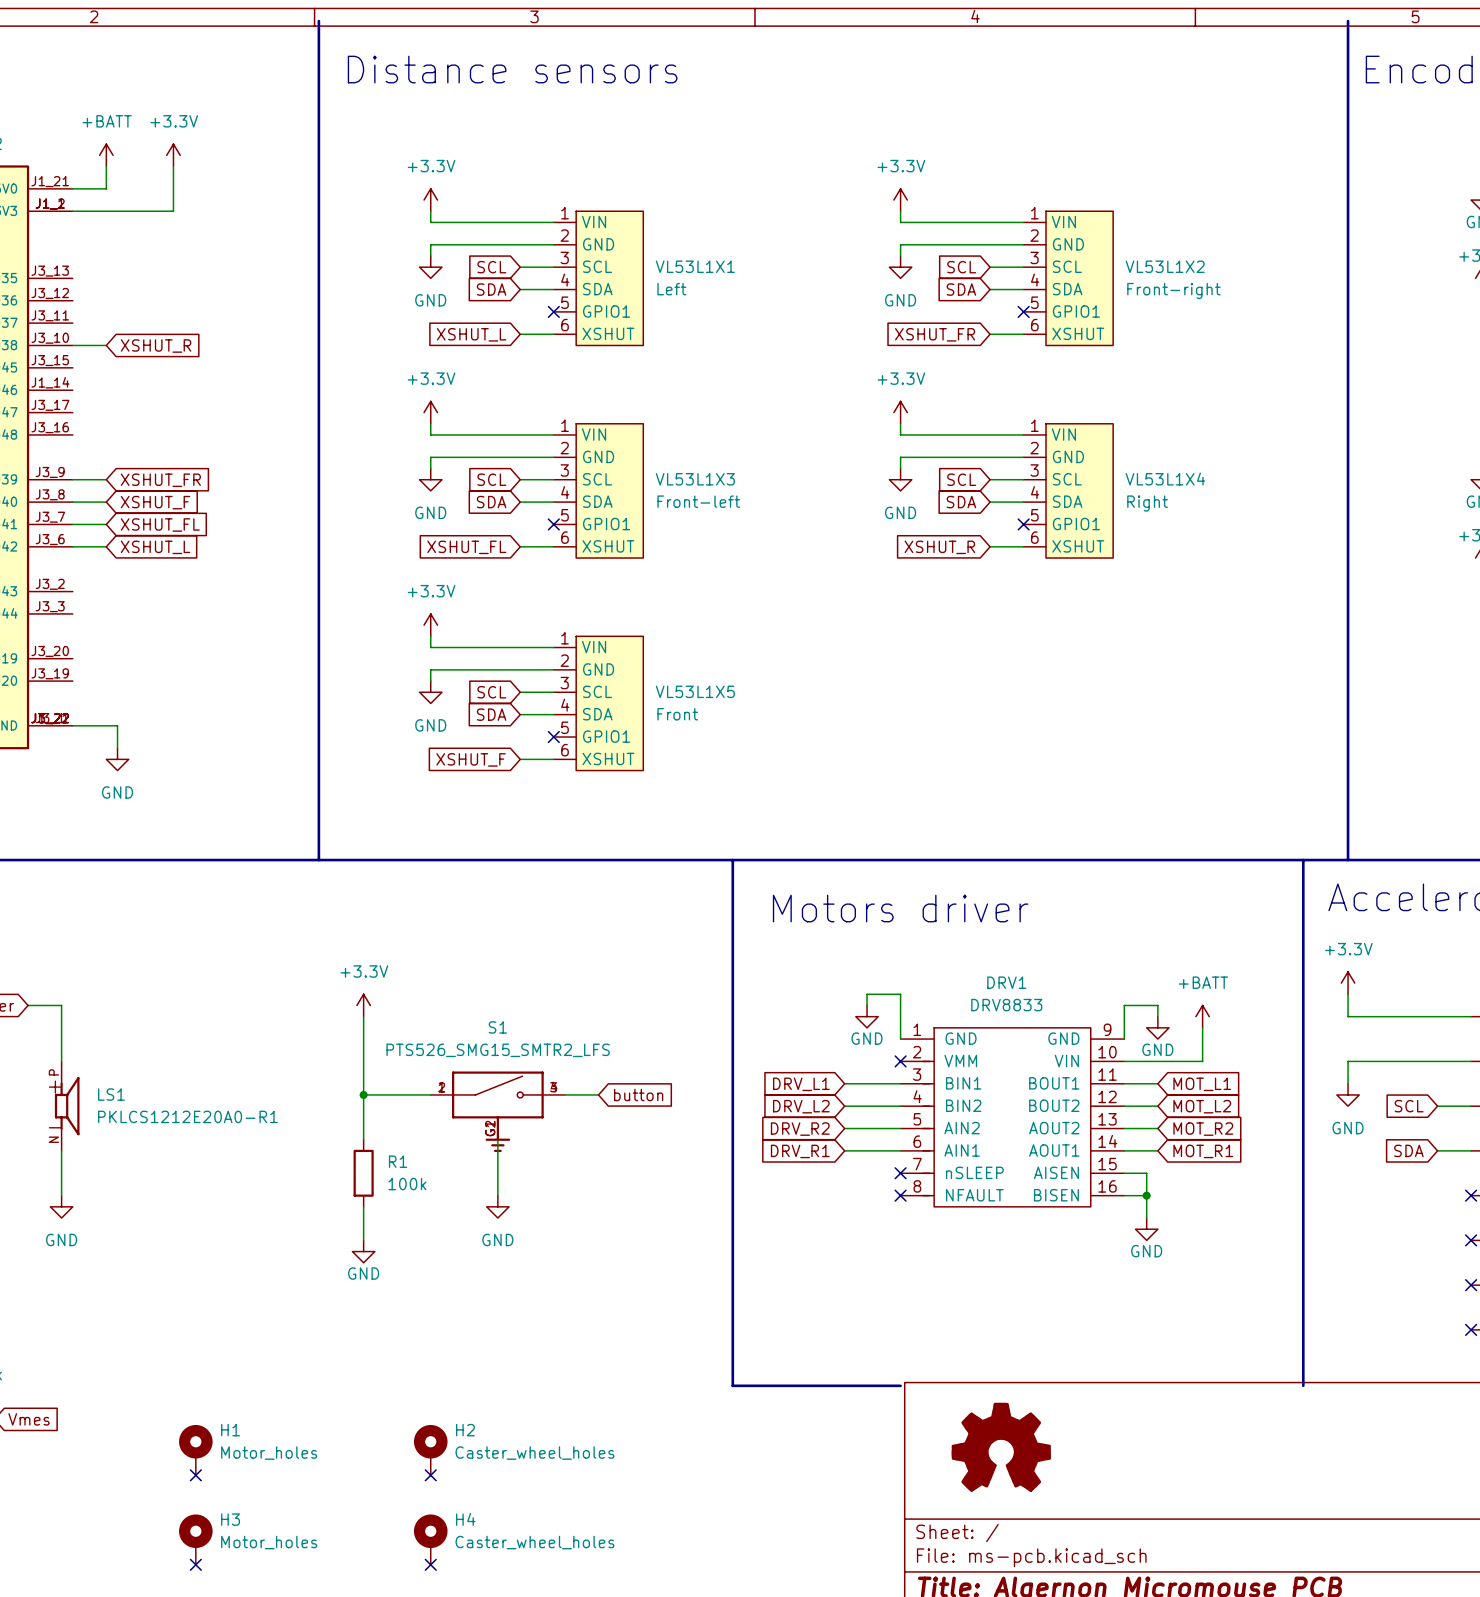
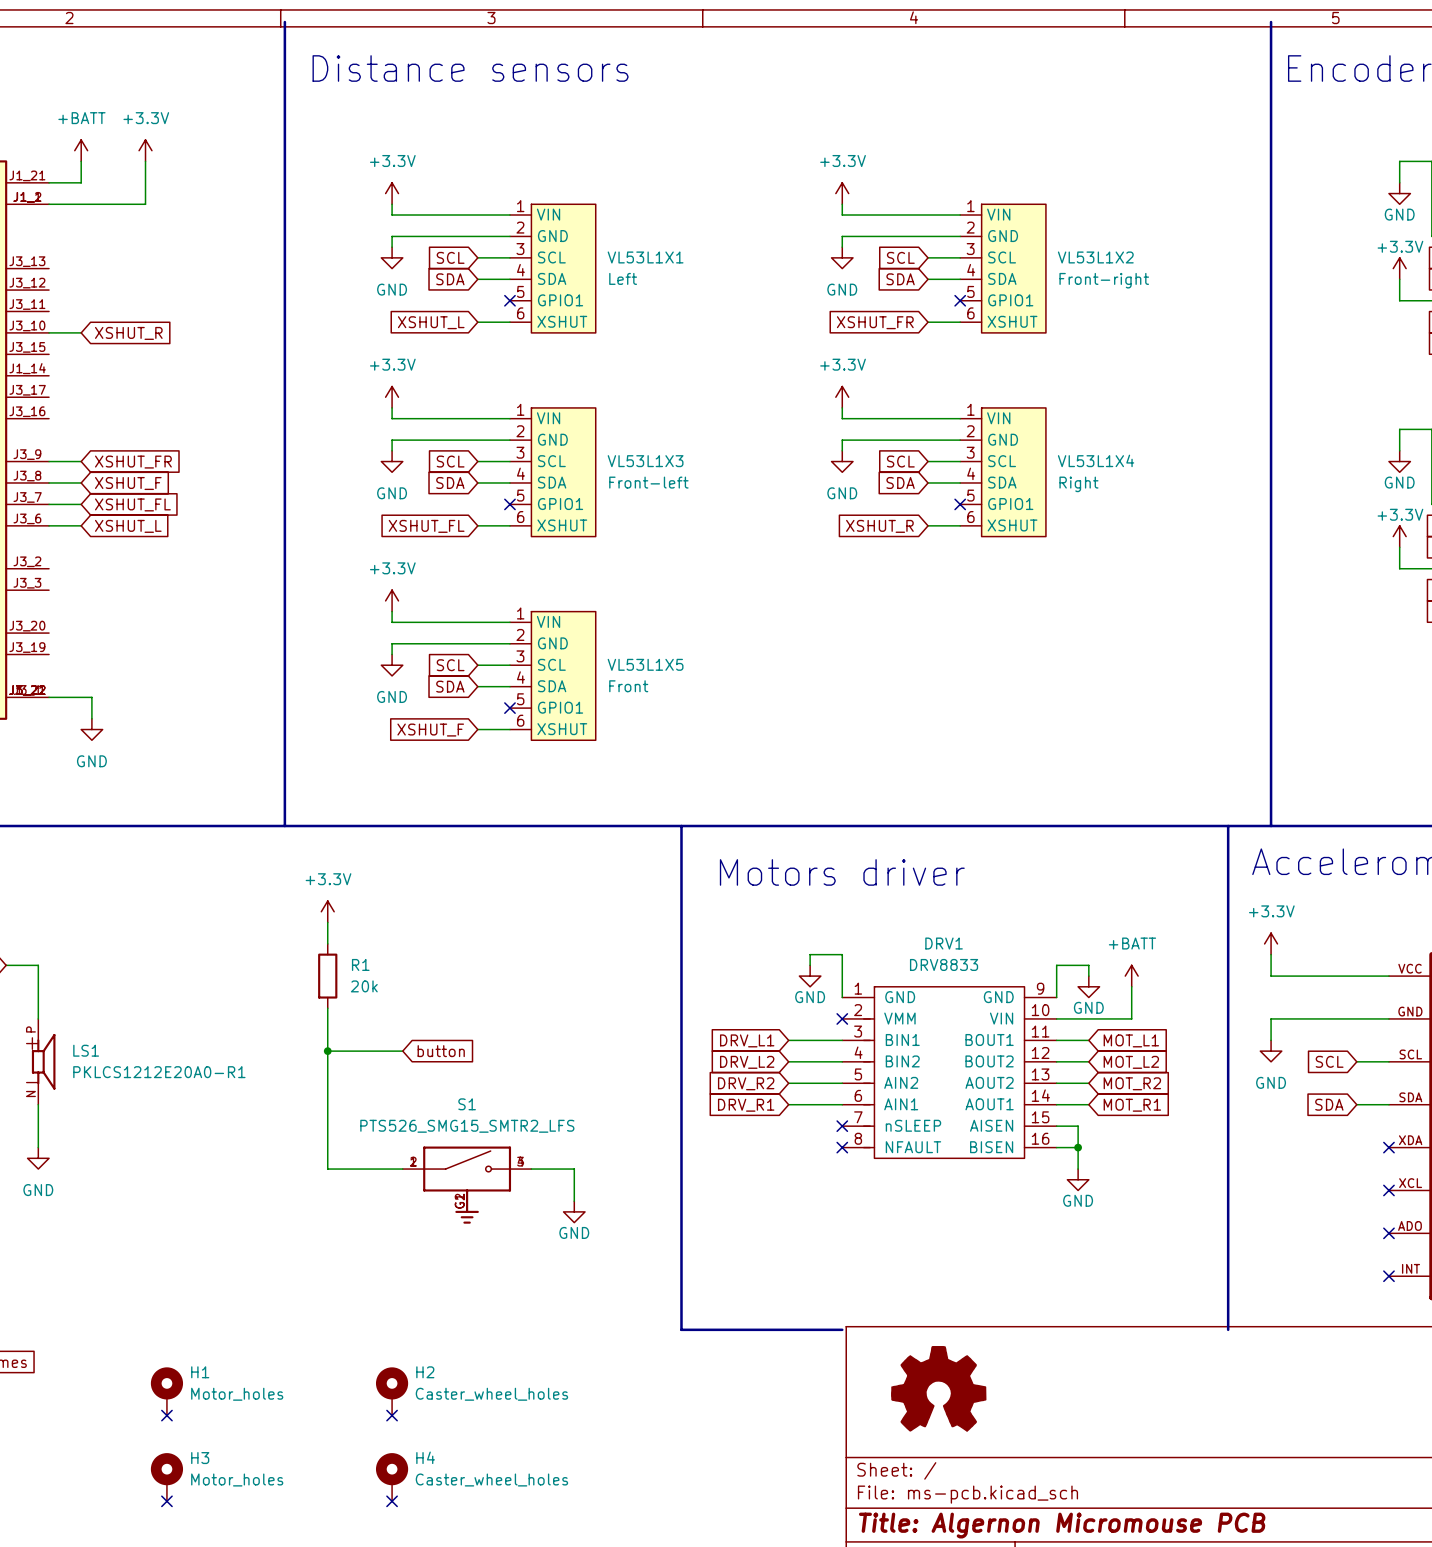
wire: none -> (327, 922) (327, 943)
power symbol position: +3.3V (363, 1005) -> +3.3V (327, 911)
wire: (363, 1016) (363, 1050) -> none
wire: (564, 1094) (598, 1094) -> none
global label position: button (638, 1094) -> button (441, 1051)
S1 position: (497, 1111) -> (467, 1185)
wire: none -> (327, 1093) (327, 1158)
wire: (497, 1139) (497, 1195) -> none
R1 position: (363, 1173) -> (327, 976)
R1 value: 100k (407, 1184) -> 20k (364, 986)
power symbol: GND (497, 1206) -> none
wire: (363, 1218) (363, 1240) -> (327, 1169) (402, 1169)
wire: none -> (531, 1169) (574, 1169) (574, 1201)
power symbol: GND (363, 1251) -> none
power symbol: none -> GND (574, 1211)

